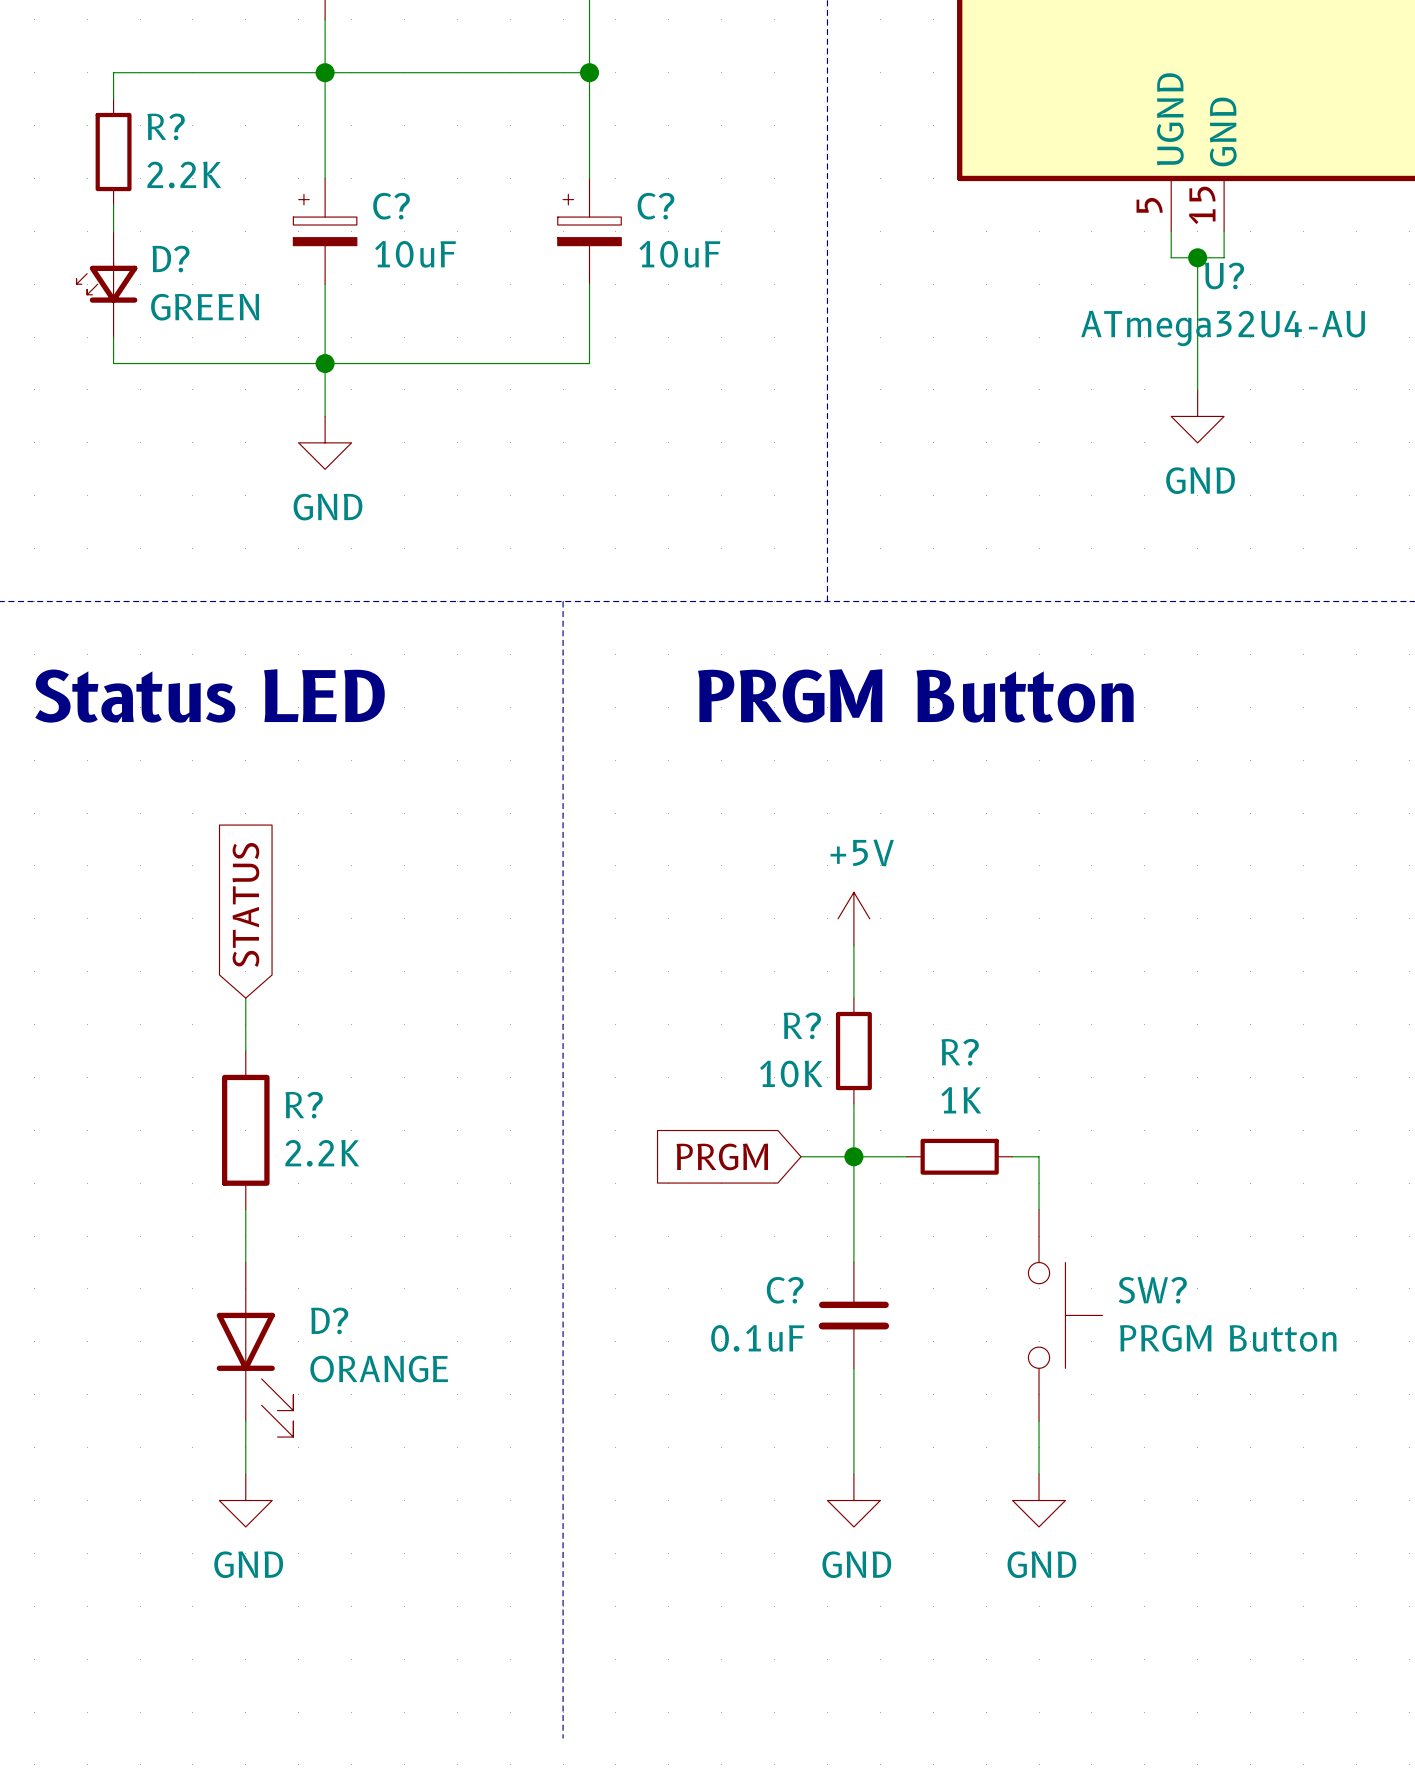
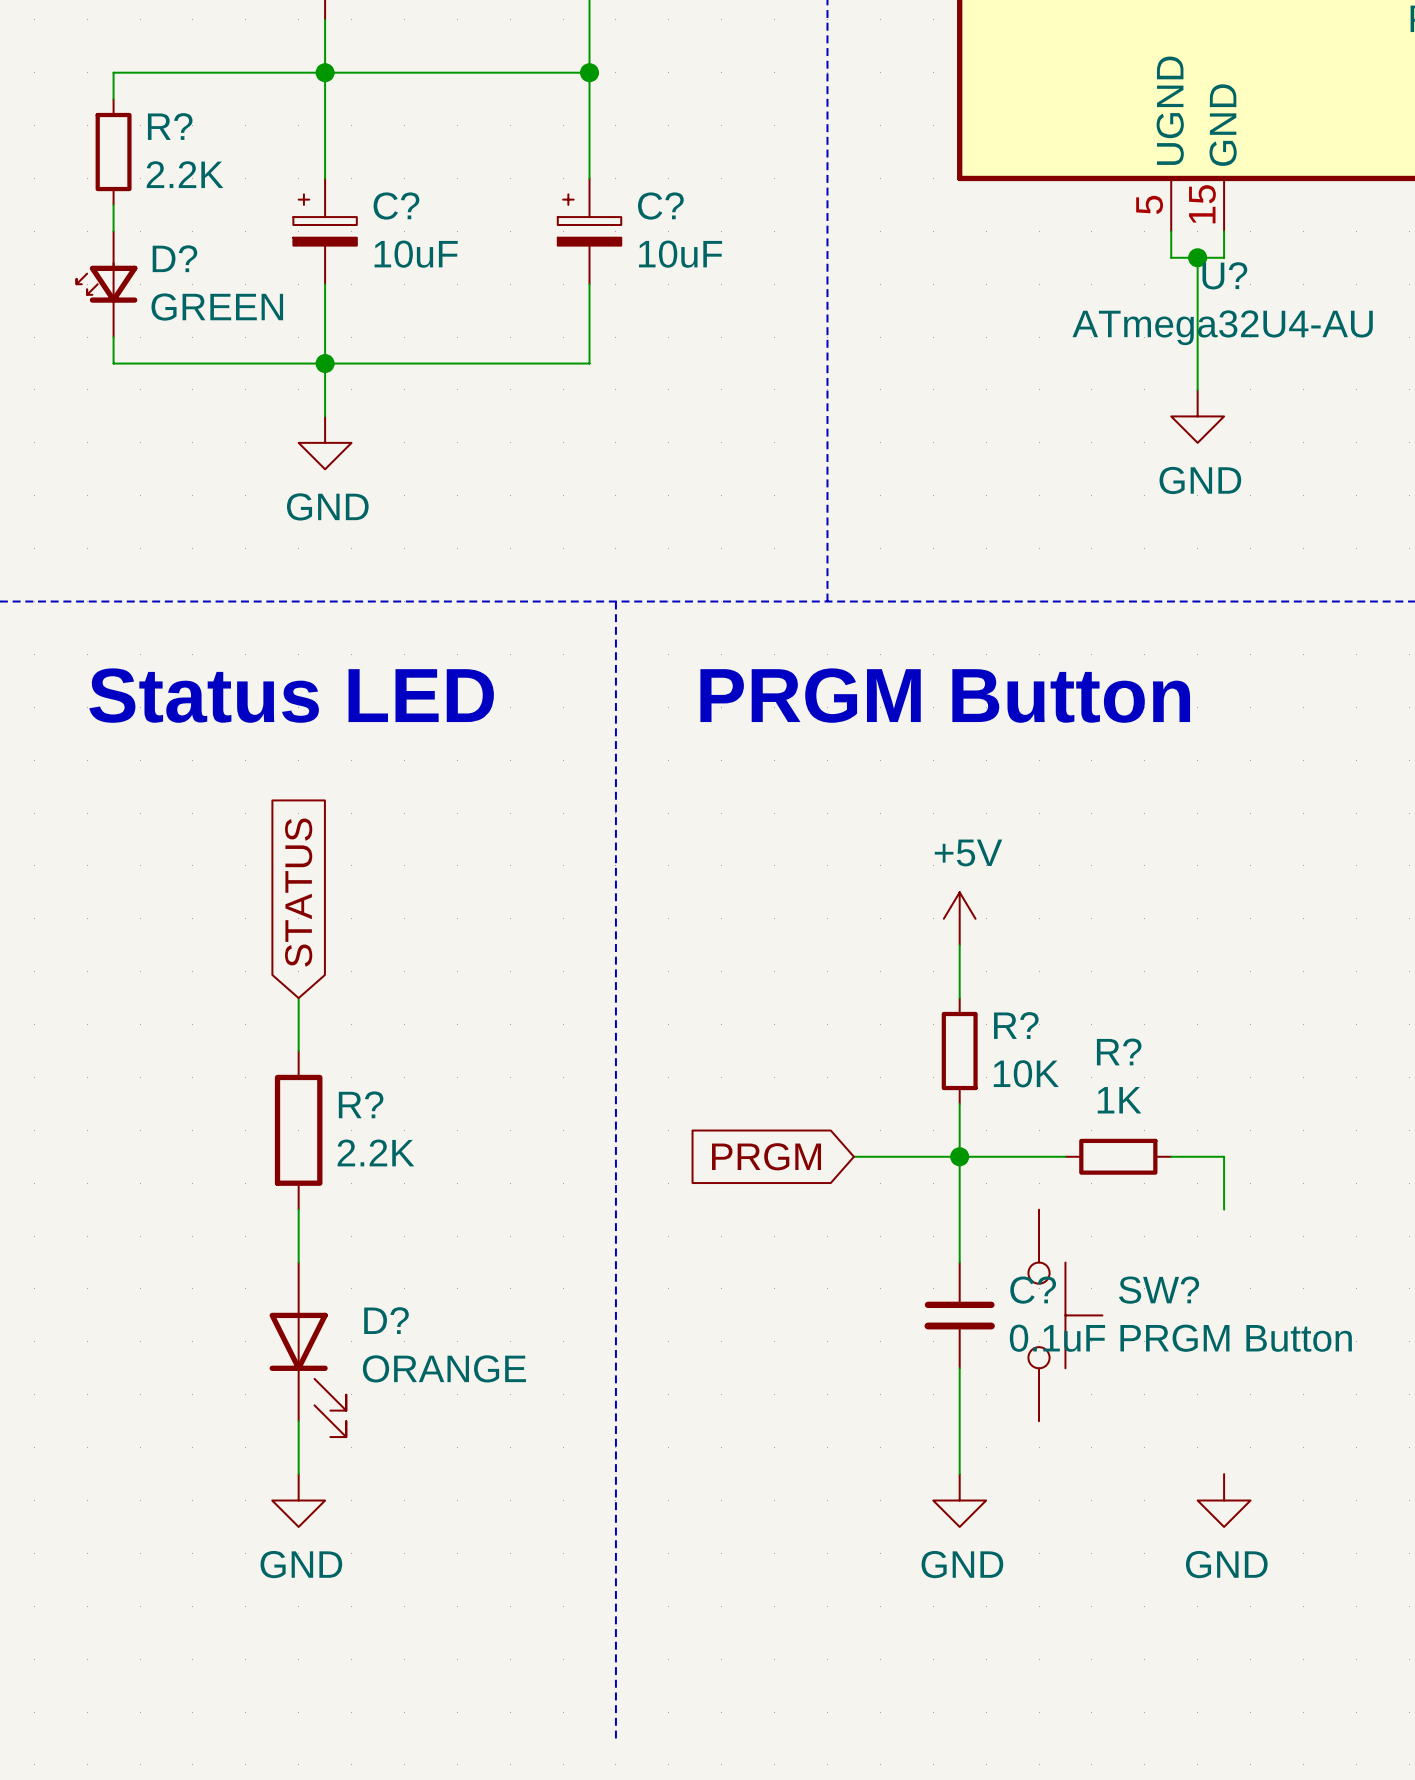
line: (563, 601) (563, 1738) -> (615, 601) (615, 1738)
text position: Status LED (210, 695) -> Status LED (291, 695)
global label position: STATUS (245, 904) -> STATUS (298, 892)
power symbol position: +5V (853, 918) -> +5V (959, 918)
wire: (853, 945) (853, 998) -> (959, 945) (959, 998)
wire: (245, 998) (245, 1051) -> (298, 998) (298, 1051)
R? name position: R? (802, 1025) -> R? (1016, 1025)
R? position: (853, 1051) -> (959, 1051)
R? value position: 10K (791, 1073) -> 10K (1026, 1073)
wire: (853, 1103) (853, 1262) -> (959, 1103) (959, 1262)
R? position: (245, 1130) -> (298, 1130)
global label position: PRGM (722, 1156) -> PRGM (766, 1156)
wire: (801, 1156) (853, 1156) -> none
junction position: (853, 1156) -> (959, 1156)
wire: none -> (906, 1156) (1012, 1156)
R? position: (959, 1156) -> (1118, 1156)
wire: (1039, 1156) (1039, 1209) -> (1039, 1156) (1065, 1156)
wire: none -> (1171, 1156) (1224, 1156) (1224, 1209)
wire: (245, 1209) (245, 1262) -> (298, 1209) (298, 1262)
C? name position: C? (785, 1290) -> C? (1033, 1290)
C? position: (853, 1315) -> (959, 1315)
C? value position: 0.1uF (757, 1338) -> 0.1uF (1057, 1338)
D? position: (255, 1349) -> (307, 1349)
wire: (853, 1368) (853, 1474) -> (959, 1368) (959, 1474)
wire: (245, 1421) (245, 1474) -> (298, 1421) (298, 1474)
wire: (1039, 1421) (1039, 1474) -> none
power symbol position: GND (245, 1500) -> GND (298, 1500)
power symbol: GND (853, 1500) -> none
power symbol: none -> GND (959, 1500)
power symbol: GND (1039, 1500) -> none
power symbol: none -> GND (1224, 1500)

